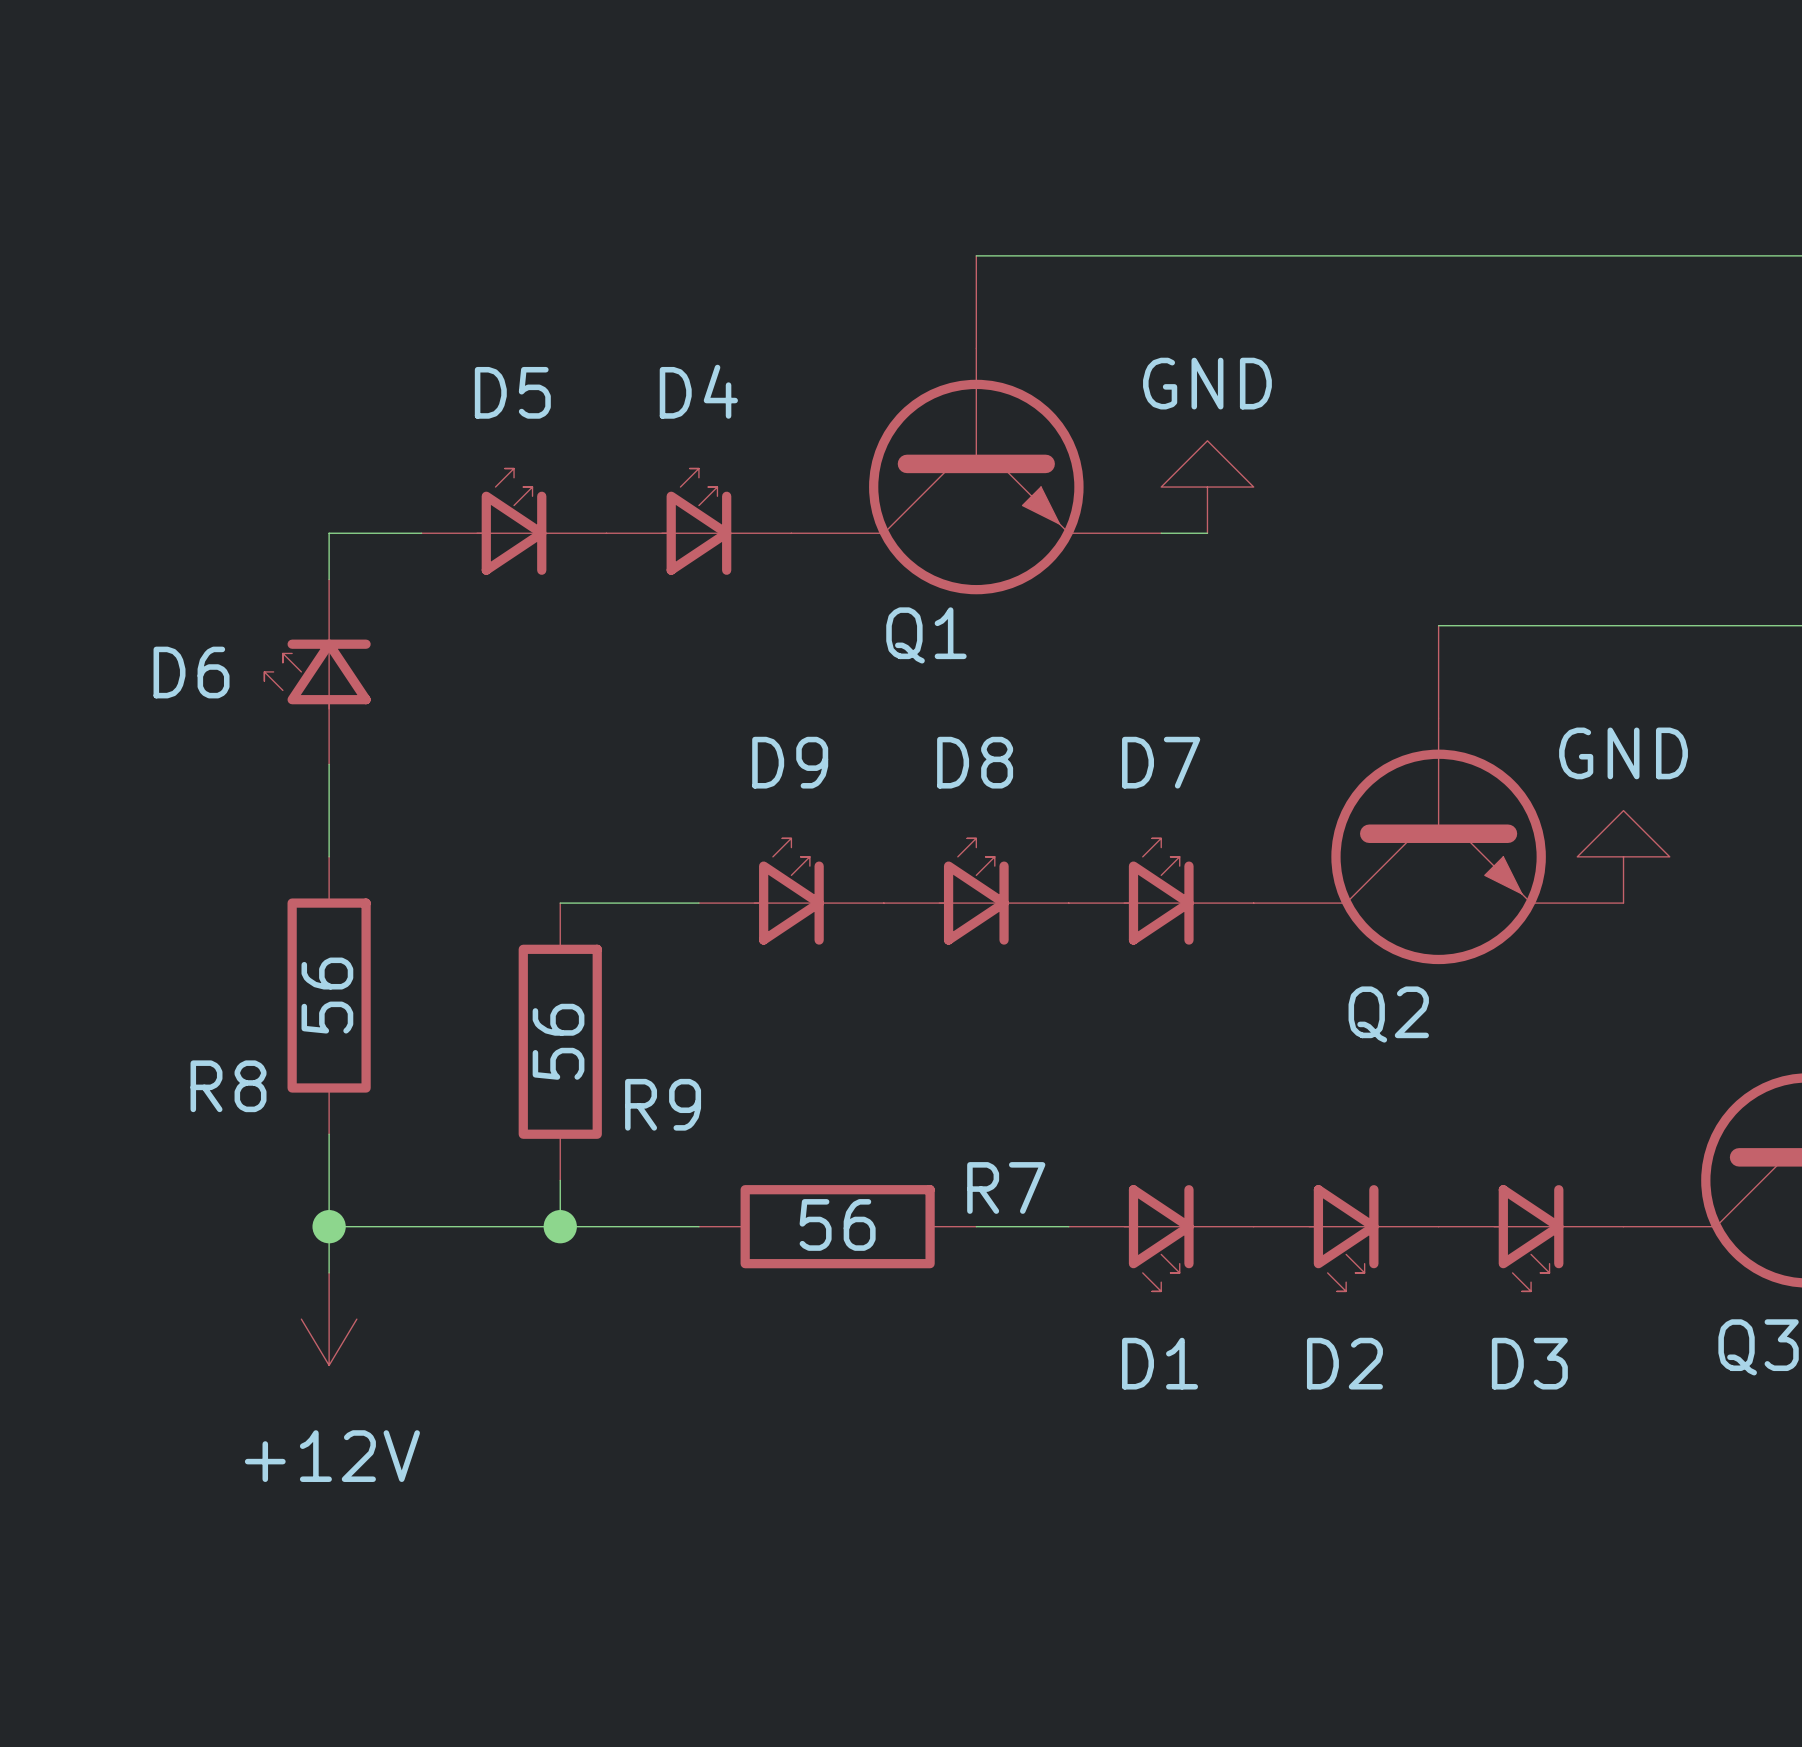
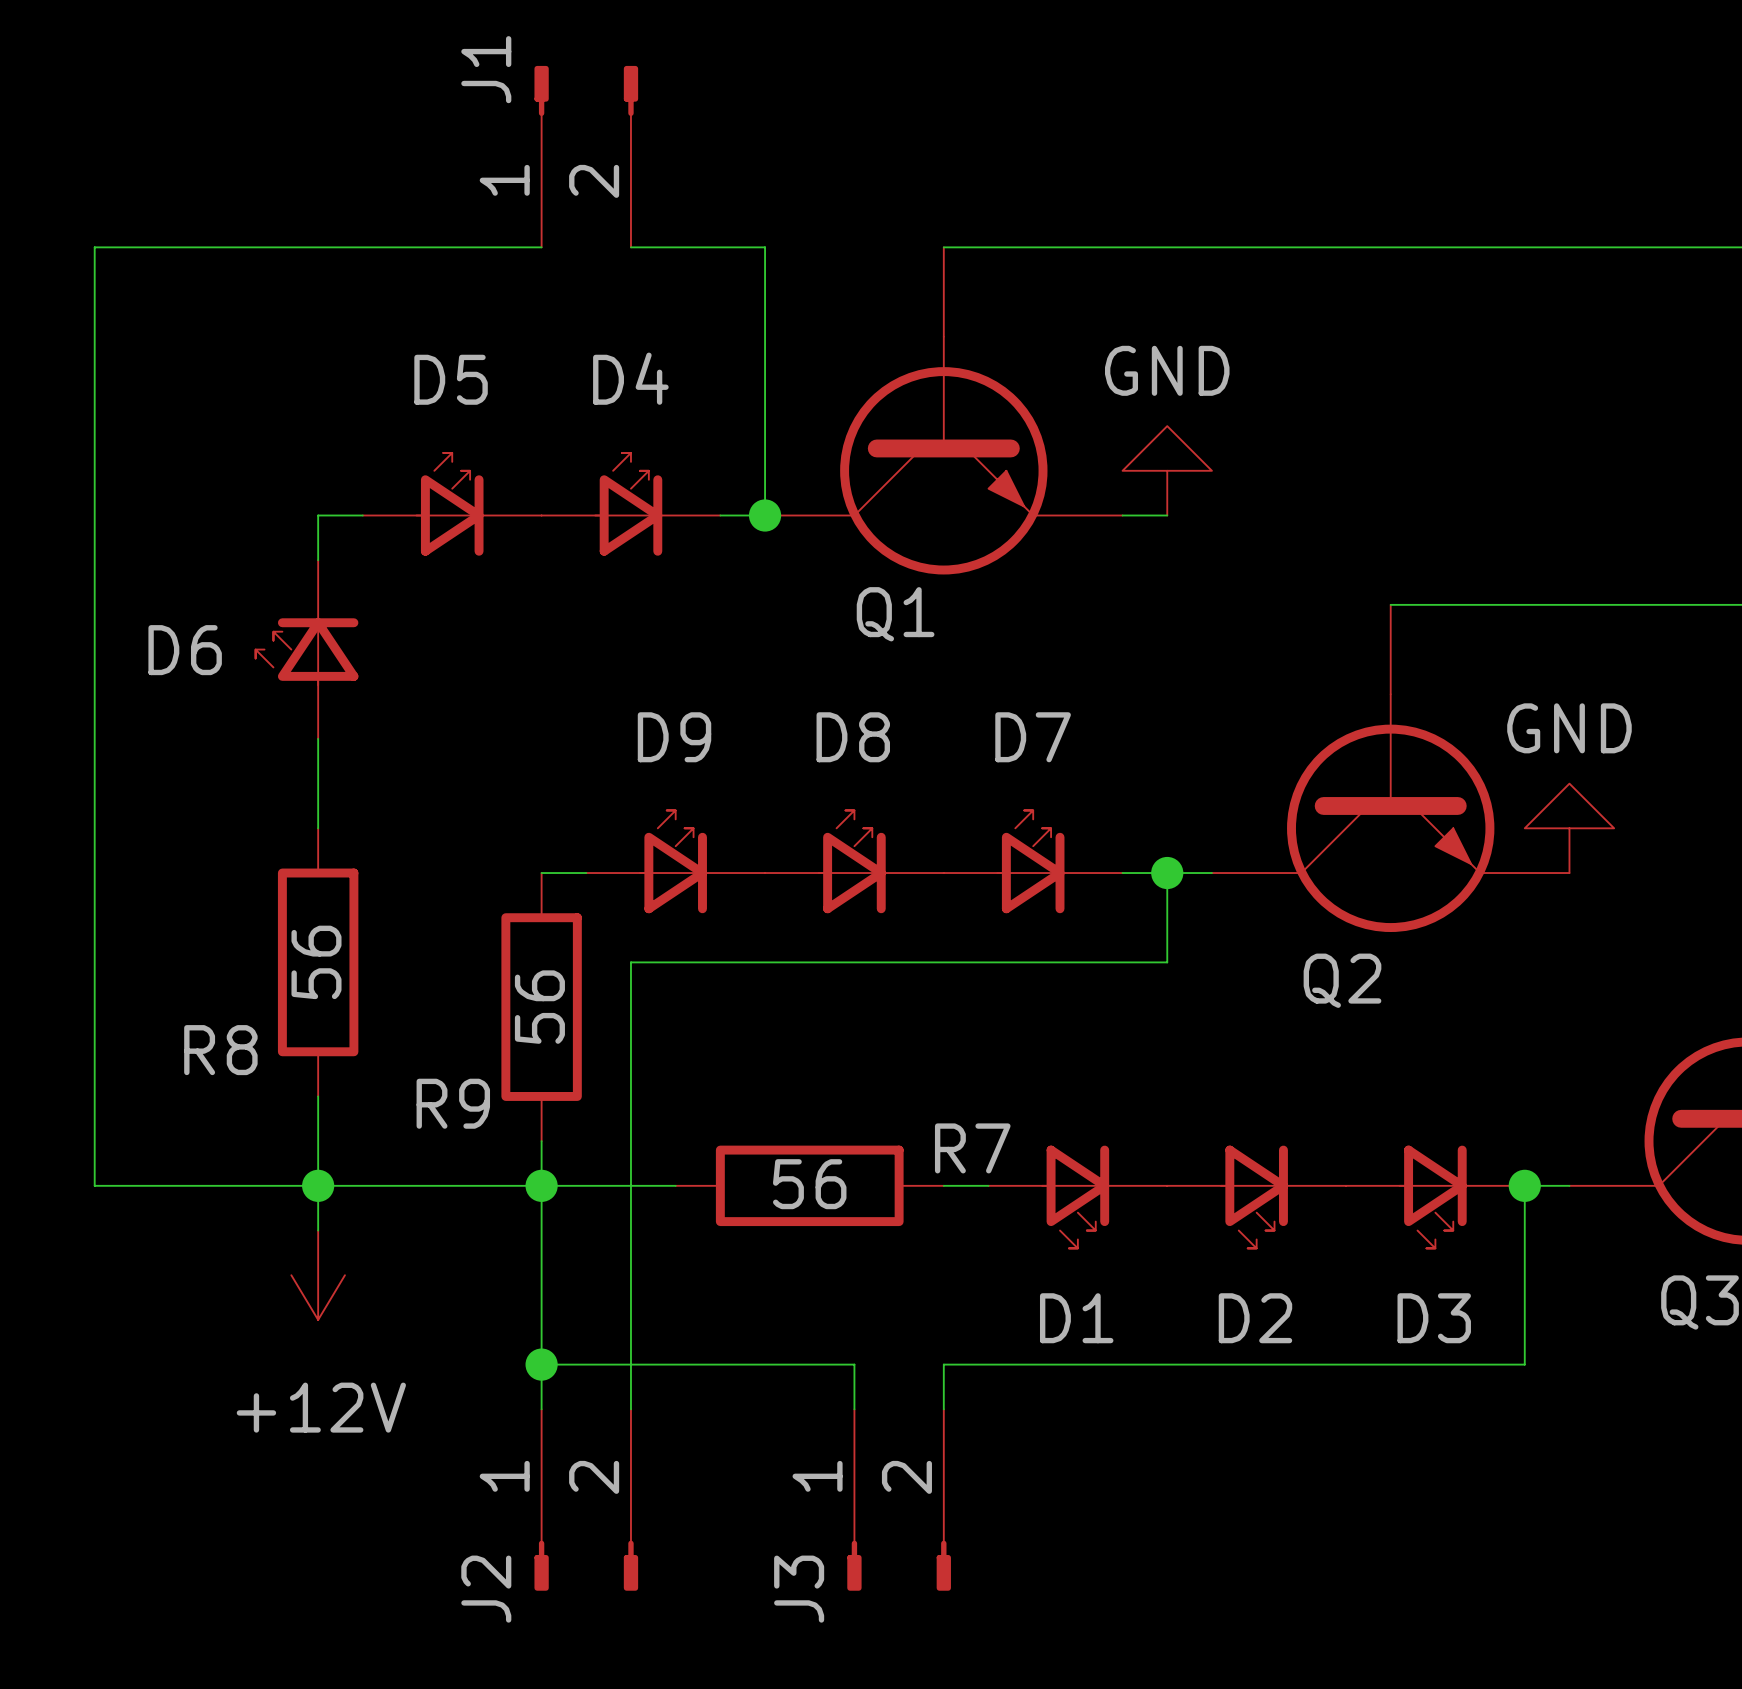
J1: none -> (586, 156)
wire: none -> (541, 247) (94, 247) (94, 1185) (318, 1185)
wire: none -> (630, 247) (765, 247) (765, 515) (720, 515)
D5 position: (514, 521) -> (452, 504)
D4 position: (698, 521) -> (630, 504)
junction: none -> (765, 515)
D9 position: (791, 891) -> (675, 861)
D8 position: (976, 891) -> (854, 861)
D7 position: (1161, 891) -> (1033, 861)
wire: none -> (1167, 873) (1167, 962) (630, 962) (630, 1409)
junction: none -> (1167, 873)
R9 name position: R9 (663, 1104) -> R9 (453, 1103)
wire: none -> (541, 1185) (541, 1409)
junction: none -> (1524, 1185)
wire: none -> (1569, 1185) (1524, 1185) (1524, 1364) (943, 1364) (943, 1409)
D1 position: (1161, 1238) -> (1077, 1197)
D2 position: (1346, 1238) -> (1256, 1197)
D3 position: (1531, 1238) -> (1435, 1197)
wire: none -> (541, 1364) (854, 1364) (854, 1409)
junction: none -> (541, 1364)
J2: none -> (586, 1500)
J3: none -> (899, 1500)

